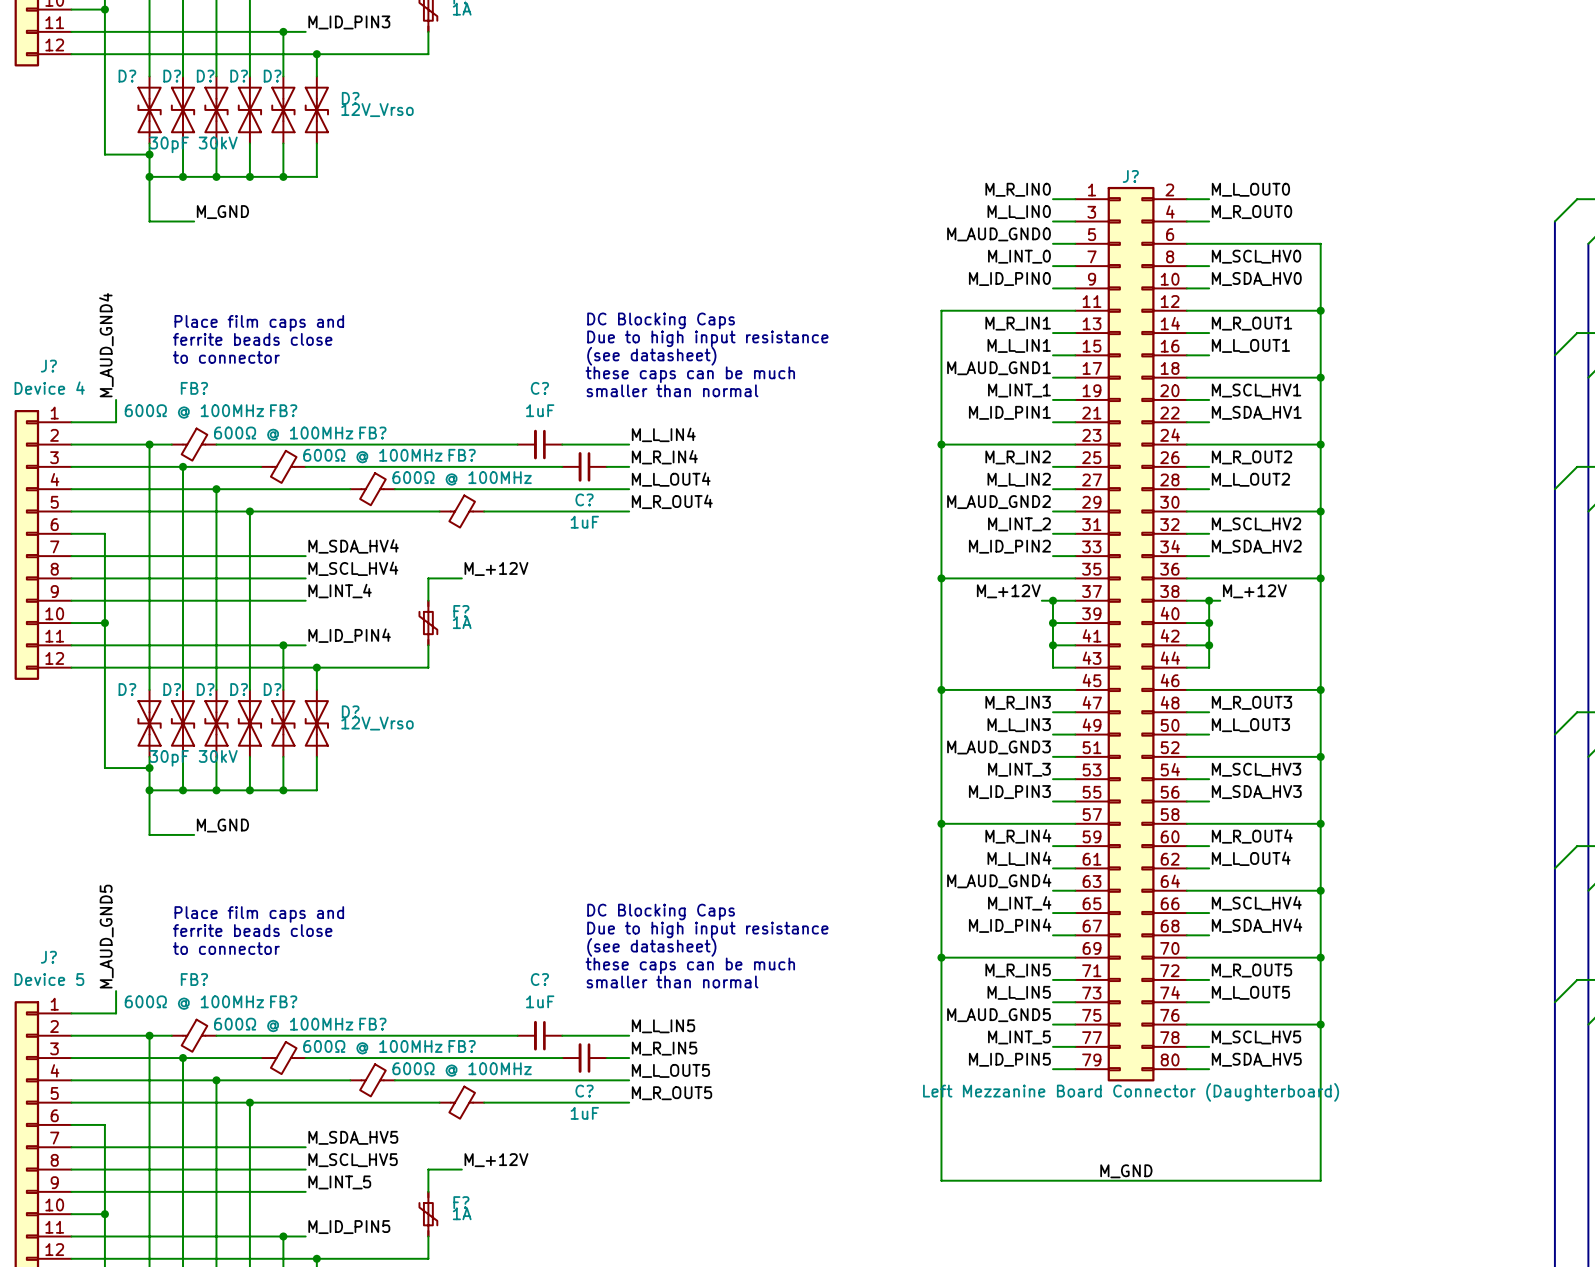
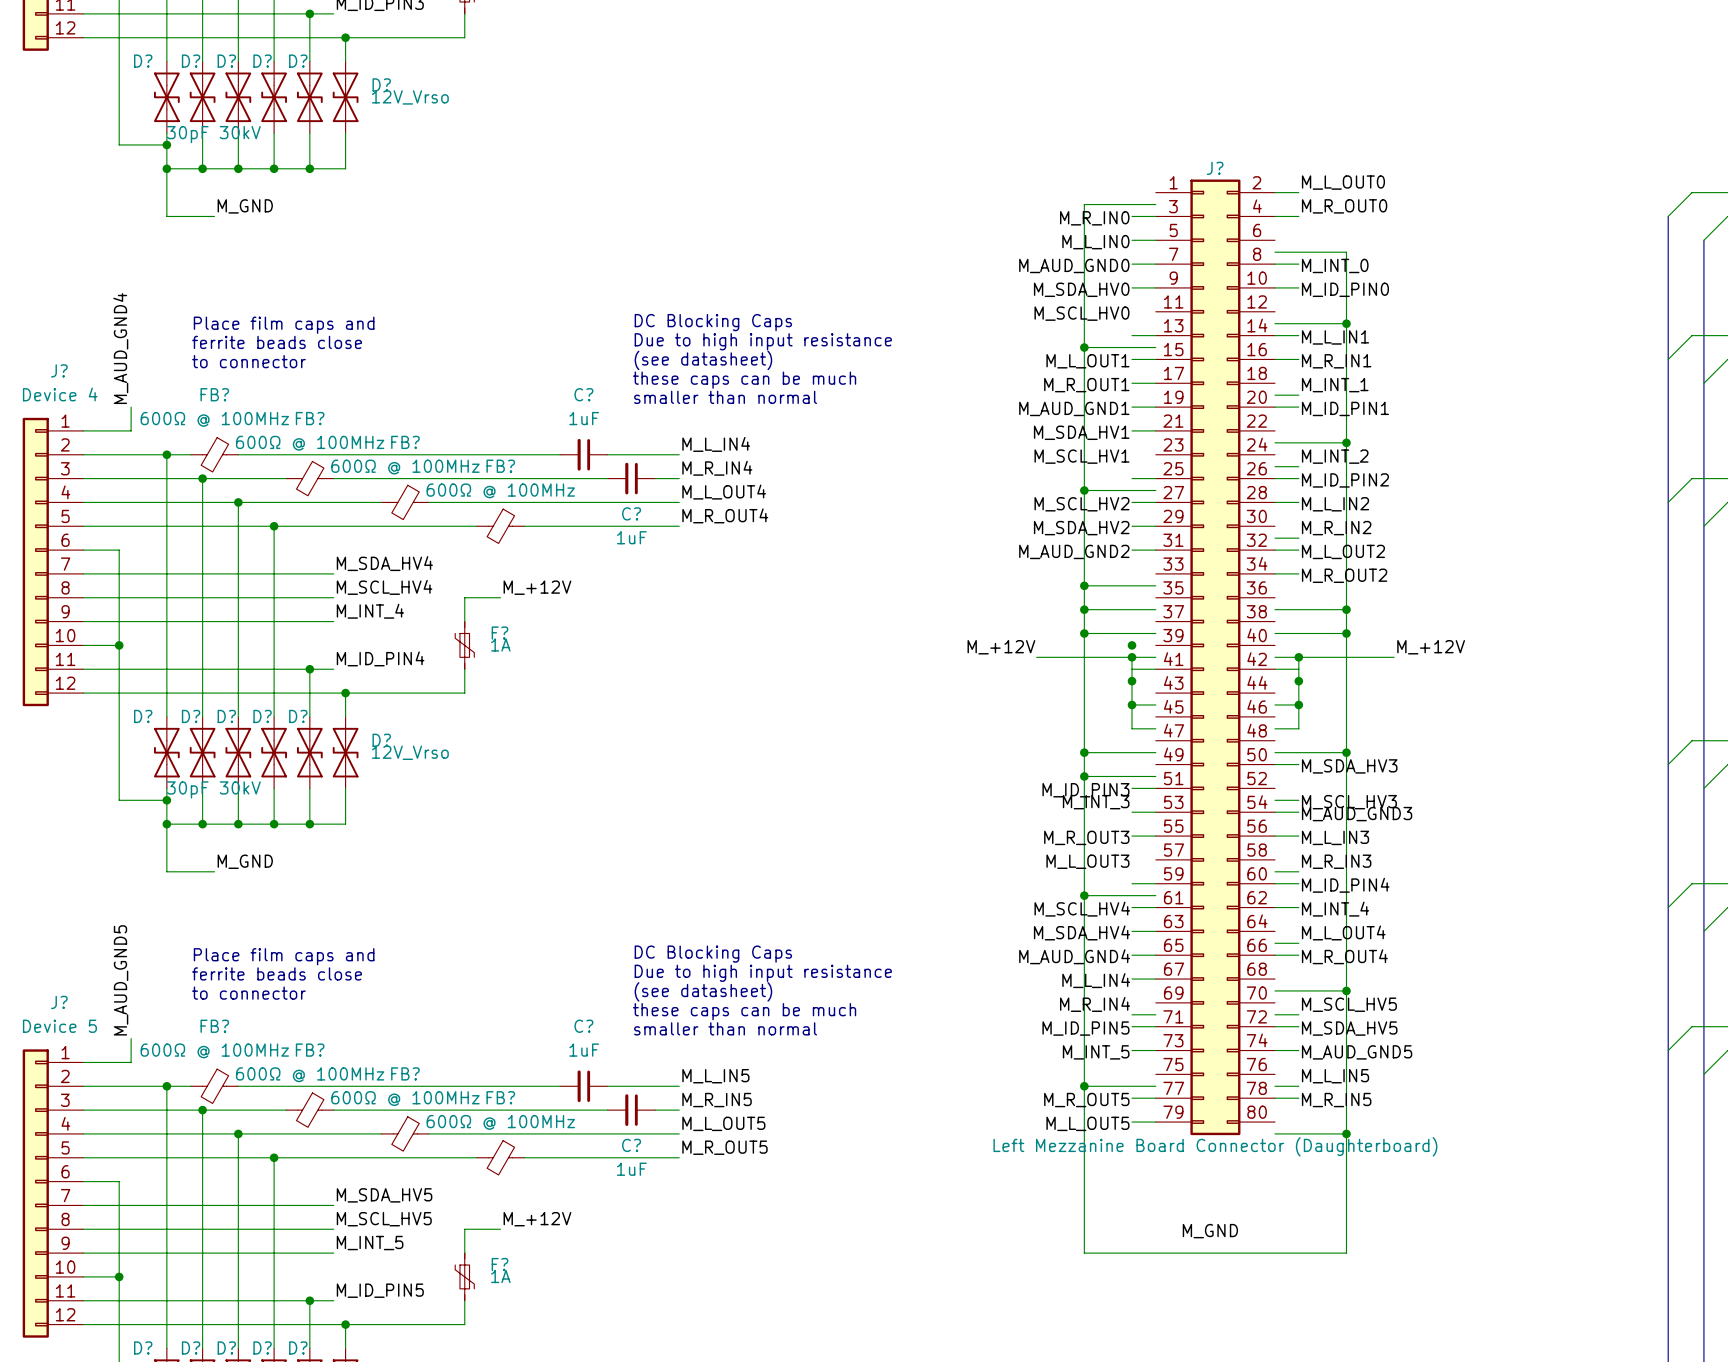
label position: M_R_IN0 (1018, 189) -> M_R_IN0 (1094, 218)
wire: (1052, 199) (1075, 199) -> none
wire: none -> (1155, 204) (1084, 204) (1084, 1253) (1346, 1253) (1346, 252) (1274, 252)
label position: M_L_IN0 (1019, 212) -> M_L_IN0 (1095, 242)
label position: M_AUD_GND0 (999, 234) -> M_AUD_GND0 (1074, 265)
wire: (1186, 243) (1320, 243) (1320, 1180) (941, 1180) (941, 310) (1075, 310) -> none
label position: M_INT_0 (1019, 256) -> M_INT_0 (1335, 265)
label position: M_SCL_HV0 (1256, 256) -> M_SCL_HV0 (1081, 313)
label position: M_ID_PIN0 (1009, 279) -> M_ID_PIN0 (1345, 289)
label position: M_SDA_HV0 (1256, 279) -> M_SDA_HV0 (1081, 289)
wire: (1186, 310) (1320, 310) -> none
junction: (1320, 310) -> none
wire: none -> (1274, 323) (1346, 323)
junction: none -> (1346, 323)
label position: M_R_IN1 (1018, 323) -> M_R_IN1 (1336, 361)
label position: M_R_OUT1 (1251, 323) -> M_R_OUT1 (1086, 385)
wire: none -> (1084, 347) (1155, 347)
junction: none -> (1084, 347)
label position: M_L_IN1 (1019, 345) -> M_L_IN1 (1335, 337)
label position: M_L_OUT1 (1250, 345) -> M_L_OUT1 (1087, 361)
label position: M_AUD_GND1 (999, 368) -> M_AUD_GND1 (1074, 408)
wire: (1186, 377) (1320, 377) -> none
junction: (1320, 377) -> none
label position: M_INT_1 (1019, 390) -> M_INT_1 (1335, 385)
label position: M_SCL_HV1 (1256, 390) -> M_SCL_HV1 (1081, 456)
label position: M_ID_PIN1 (1009, 412) -> M_ID_PIN1 (1345, 408)
label position: M_SDA_HV1 (1256, 412) -> M_SDA_HV1 (1081, 432)
wire: (1186, 422) (1209, 422) -> (1274, 395) (1298, 395)
wire: none -> (1274, 442) (1346, 442)
junction: none -> (1346, 442)
wire: (941, 444) (1075, 444) -> none
junction: (941, 444) -> none
wire: (1186, 444) (1320, 444) -> none
junction: (1320, 444) -> none
label position: M_R_IN2 (1018, 457) -> M_R_IN2 (1336, 528)
label position: M_R_OUT2 (1251, 457) -> M_R_OUT2 (1344, 575)
wire: none -> (1084, 490) (1155, 490)
junction: none -> (1084, 490)
label position: M_L_IN2 (1019, 479) -> M_L_IN2 (1335, 504)
label position: M_L_OUT2 (1250, 479) -> M_L_OUT2 (1343, 551)
label position: M_AUD_GND2 (999, 502) -> M_AUD_GND2 (1074, 551)
wire: (1186, 511) (1320, 511) -> none
junction: (1320, 511) -> none
label position: M_INT_2 (1019, 524) -> M_INT_2 (1335, 456)
label position: M_SCL_HV2 (1256, 524) -> M_SCL_HV2 (1081, 504)
label position: M_ID_PIN2 (1009, 546) -> M_ID_PIN2 (1345, 480)
label position: M_SDA_HV2 (1256, 546) -> M_SDA_HV2 (1081, 528)
wire: (1052, 556) (1075, 556) -> (1274, 466) (1298, 466)
wire: none -> (1084, 585) (1155, 585)
junction: none -> (1084, 585)
wire: (941, 578) (1075, 578) -> none
junction: (941, 578) -> none
wire: (1186, 578) (1320, 578) -> none
junction: (1320, 578) -> none
wire: none -> (1084, 609) (1155, 609)
junction: none -> (1084, 609)
wire: none -> (1274, 609) (1346, 609)
junction: none -> (1346, 609)
label position: M_+12V (1008, 591) -> M_+12V (1001, 647)
label position: M_+12V (1254, 591) -> M_+12V (1431, 647)
wire: (1041, 600) (1075, 600) -> none
wire: (1052, 600) (1052, 634) -> none
junction: (1052, 600) -> none
wire: (1186, 600) (1220, 600) -> none
wire: (1209, 600) (1209, 634) -> none
junction: (1209, 600) -> none
wire: none -> (1084, 633) (1155, 633)
junction: none -> (1084, 633)
wire: none -> (1274, 633) (1346, 633)
junction: none -> (1346, 633)
wire: (1052, 623) (1075, 623) -> (1274, 800) (1298, 800)
wire: (1186, 623) (1209, 623) -> (1274, 538) (1298, 538)
junction: (1209, 623) -> none
wire: none -> (1036, 657) (1155, 657)
junction: none -> (1132, 657)
wire: none -> (1274, 657) (1394, 657)
junction: none -> (1298, 657)
junction: (1052, 645) -> none
junction: (1209, 645) -> none
junction: none -> (1132, 681)
junction: none -> (1298, 681)
wire: (1052, 667) (1075, 667) -> (1132, 693) (1132, 728) (1155, 728)
wire: (1186, 667) (1209, 667) -> (1274, 728) (1298, 728) (1298, 693)
junction: none -> (1132, 704)
junction: none -> (1298, 704)
wire: (941, 689) (1075, 689) -> none
junction: (941, 689) -> none
wire: (1186, 689) (1320, 689) -> none
junction: (1320, 689) -> none
label position: M_R_IN3 (1018, 702) -> M_R_IN3 (1336, 861)
label position: M_R_OUT3 (1251, 702) -> M_R_OUT3 (1086, 837)
wire: (1052, 712) (1075, 712) -> (1132, 704) (1155, 704)
wire: (1186, 712) (1209, 712) -> (1274, 704) (1298, 704)
wire: none -> (1084, 752) (1155, 752)
junction: none -> (1084, 752)
wire: none -> (1274, 752) (1346, 752)
junction: none -> (1346, 752)
label position: M_L_IN3 (1019, 725) -> M_L_IN3 (1335, 837)
label position: M_L_OUT3 (1250, 725) -> M_L_OUT3 (1087, 861)
wire: (1052, 734) (1075, 734) -> (1274, 871) (1298, 871)
wire: none -> (1084, 776) (1155, 776)
junction: none -> (1084, 776)
label position: M_AUD_GND3 (999, 747) -> M_AUD_GND3 (1357, 814)
wire: (1186, 756) (1320, 756) -> none
junction: (1320, 756) -> none
label position: M_ID_PIN3 (1009, 792) -> M_ID_PIN3 (1085, 790)
label position: M_SDA_HV3 (1256, 792) -> M_SDA_HV3 (1349, 766)
wire: (941, 823) (1075, 823) -> none
junction: (941, 823) -> none
wire: (1186, 823) (1320, 823) -> none
junction: (1320, 823) -> none
label position: M_R_IN4 (1018, 836) -> M_R_IN4 (1095, 1004)
label position: M_R_OUT4 (1252, 836) -> M_R_OUT4 (1344, 956)
wire: none -> (1084, 895) (1155, 895)
junction: none -> (1084, 895)
label position: M_L_IN4 (1019, 858) -> M_L_IN4 (1096, 980)
label position: M_L_OUT4 (1251, 858) -> M_L_OUT4 (1343, 932)
label position: M_AUD_GND4 (999, 881) -> M_AUD_GND4 (1074, 956)
wire: (1186, 890) (1320, 890) -> none
junction: (1320, 890) -> none
label position: M_INT_4 (1019, 903) -> M_INT_4 (1335, 909)
label position: M_SCL_HV4 (1256, 903) -> M_SCL_HV4 (1082, 909)
label position: M_ID_PIN4 (1010, 925) -> M_ID_PIN4 (1345, 885)
label position: M_SDA_HV4 (1257, 925) -> M_SDA_HV4 (1081, 932)
wire: (1186, 935) (1209, 935) -> (1274, 943) (1298, 943)
wire: none -> (1274, 990) (1346, 990)
junction: none -> (1346, 990)
wire: (941, 957) (1075, 957) -> none
junction: (941, 957) -> none
wire: (1186, 957) (1320, 957) -> none
junction: (1320, 957) -> none
wire: none -> (1274, 1014) (1298, 1014)
label position: M_R_IN5 (1018, 970) -> M_R_IN5 (1336, 1100)
label position: M_R_OUT5 (1251, 970) -> M_R_OUT5 (1086, 1100)
label position: M_L_IN5 (1019, 992) -> M_L_IN5 (1335, 1076)
label position: M_L_OUT5 (1250, 992) -> M_L_OUT5 (1087, 1123)
label position: M_AUD_GND5 (999, 1015) -> M_AUD_GND5 (1357, 1052)
wire: (1052, 1024) (1075, 1024) -> (1132, 1014) (1155, 1014)
wire: (1186, 1024) (1320, 1024) -> none
junction: (1320, 1024) -> none
wire: none -> (1084, 1086) (1155, 1086)
junction: none -> (1084, 1086)
label position: M_INT_5 (1019, 1037) -> M_INT_5 (1096, 1052)
label position: M_SCL_HV5 (1256, 1037) -> M_SCL_HV5 (1349, 1004)
label position: M_ID_PIN5 (1009, 1059) -> M_ID_PIN5 (1085, 1028)
label position: M_SDA_HV5 (1256, 1059) -> M_SDA_HV5 (1349, 1028)
wire: (1186, 1069) (1209, 1069) -> (1274, 1086) (1298, 1086)
wire: none -> (1274, 1133) (1346, 1133)
junction: none -> (1346, 1133)

